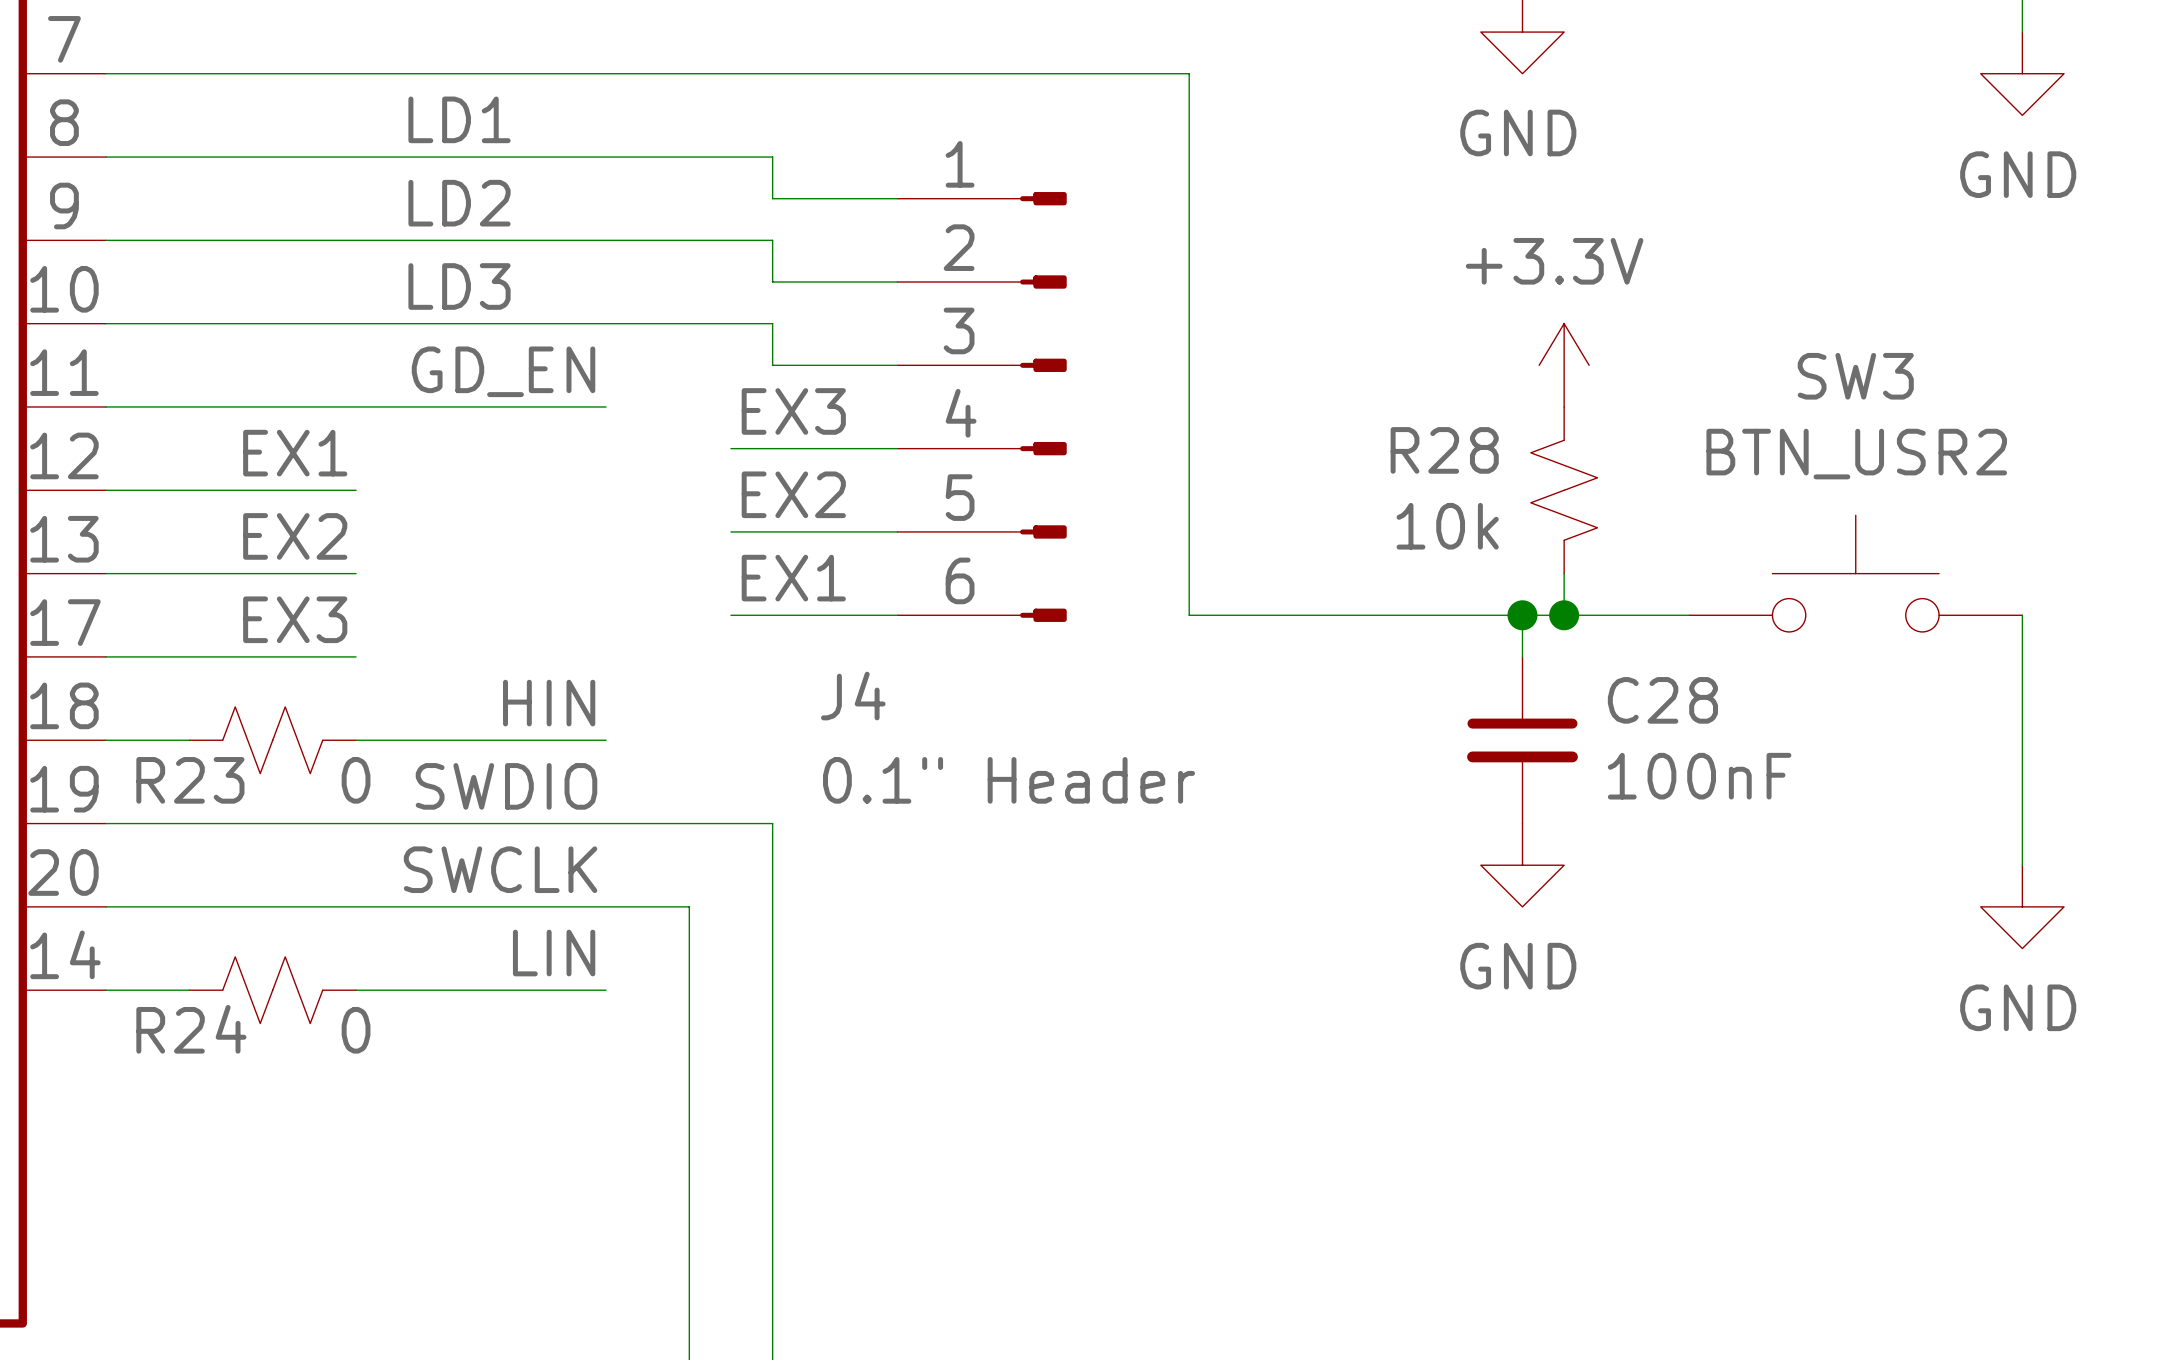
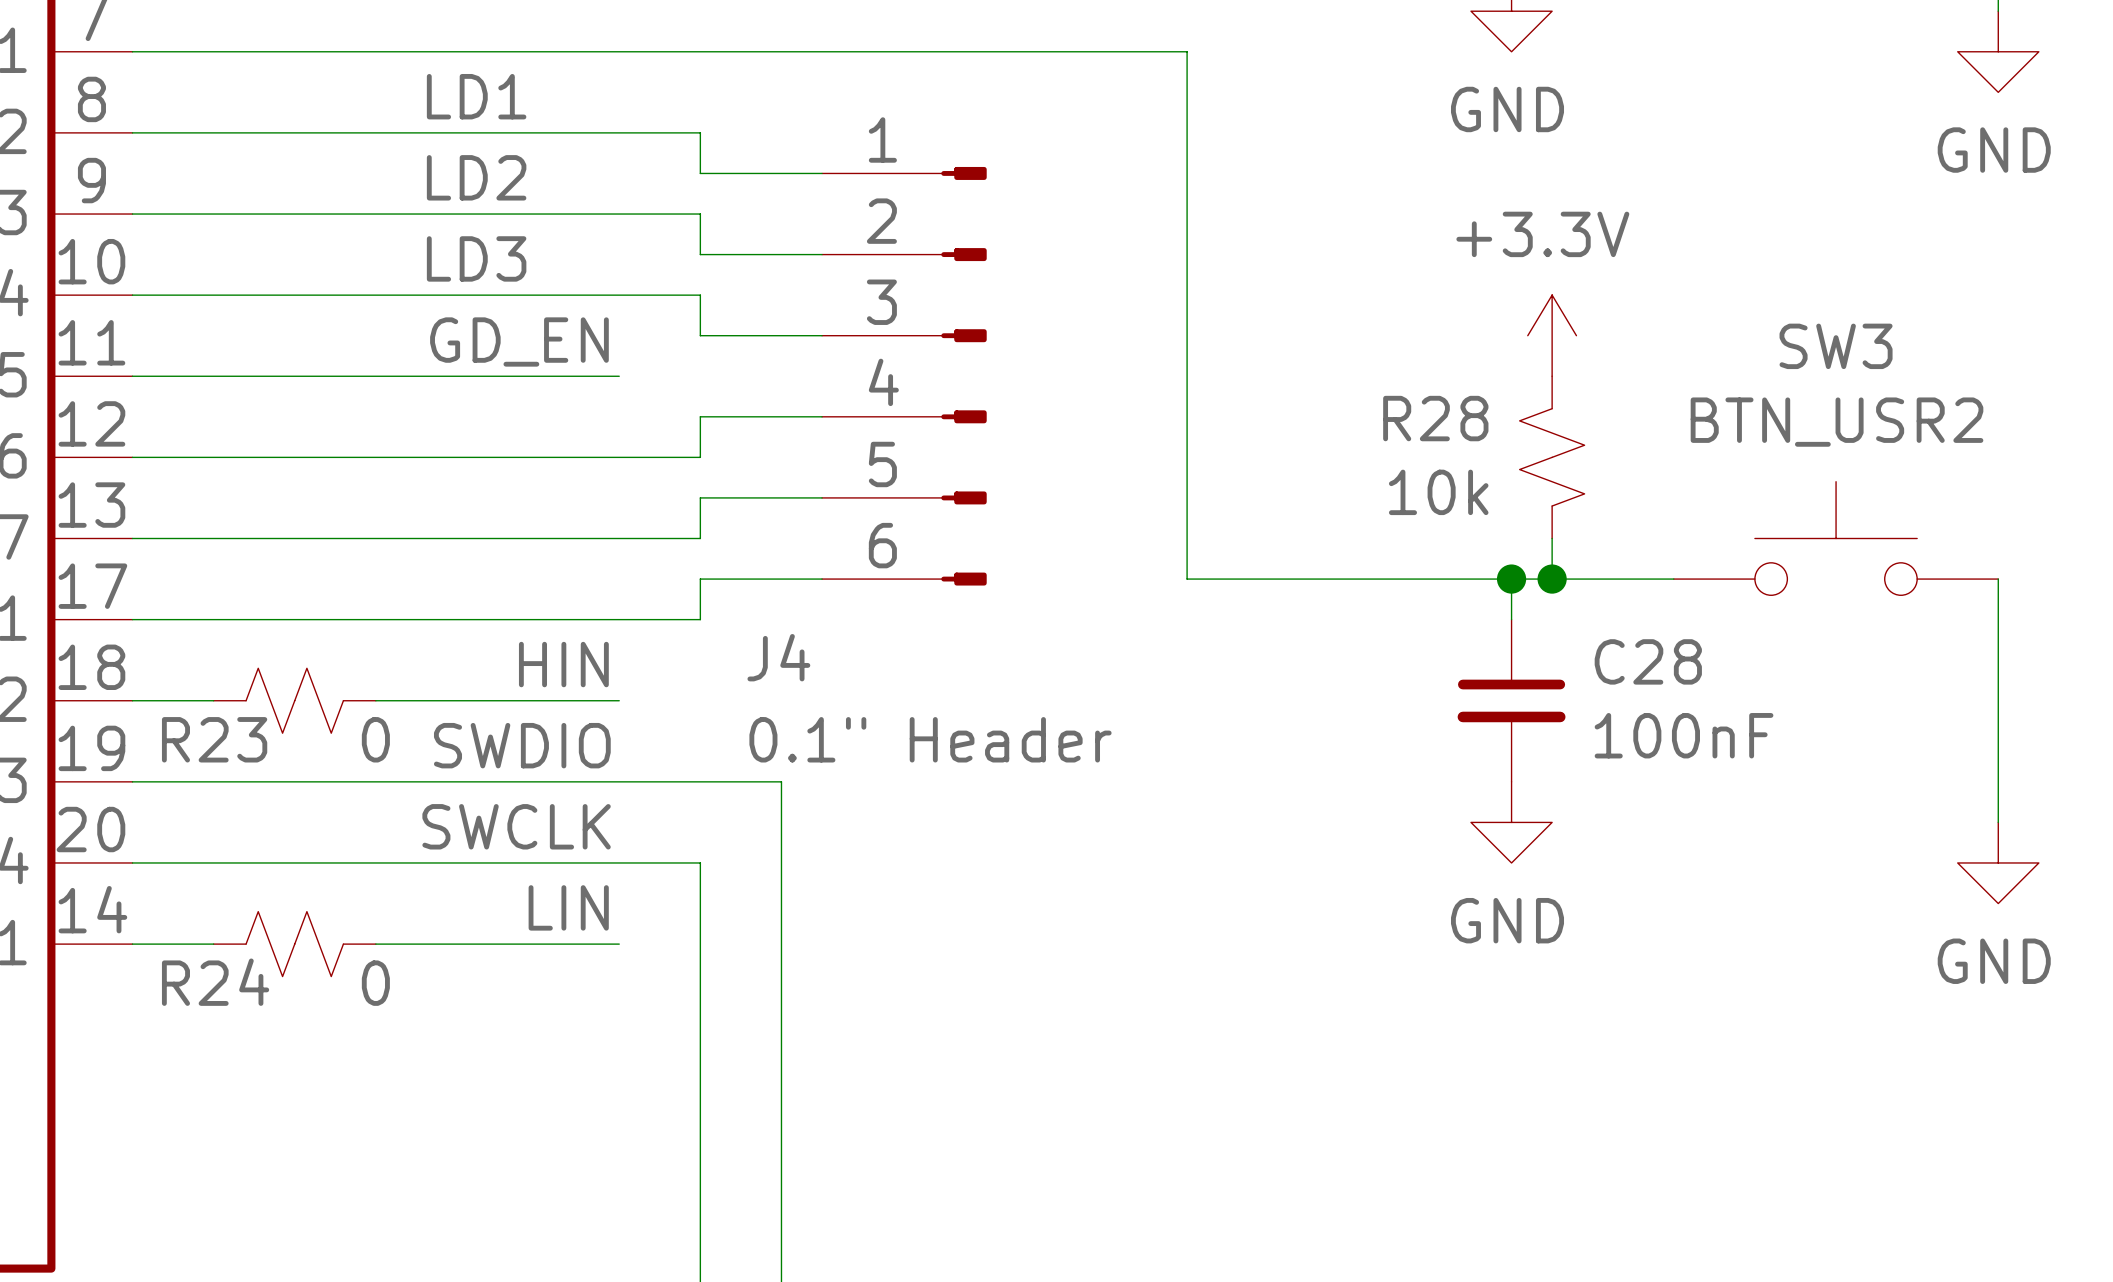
wire: (689, 157) (772, 157) (772, 198) -> (700, 132) (700, 173) (781, 173)
wire: (689, 240) (772, 240) (772, 282) -> (700, 214) (700, 254) (781, 254)
wire: (689, 323) (772, 323) (772, 365) -> (700, 295) (700, 335) (781, 335)
J4 position: (982, 406) -> (904, 376)
label: EX3 (793, 411) -> none
wire: none -> (740, 416) (700, 416) (700, 457) (375, 457)
label: EX1 (295, 453) -> none
label: EX2 (793, 494) -> none
wire: none -> (740, 497) (700, 497) (700, 538) (375, 538)
label: EX2 (295, 536) -> none
label: EX1 (793, 578) -> none
wire: none -> (740, 579) (700, 579) (700, 619) (375, 619)
label: EX3 (295, 619) -> none

